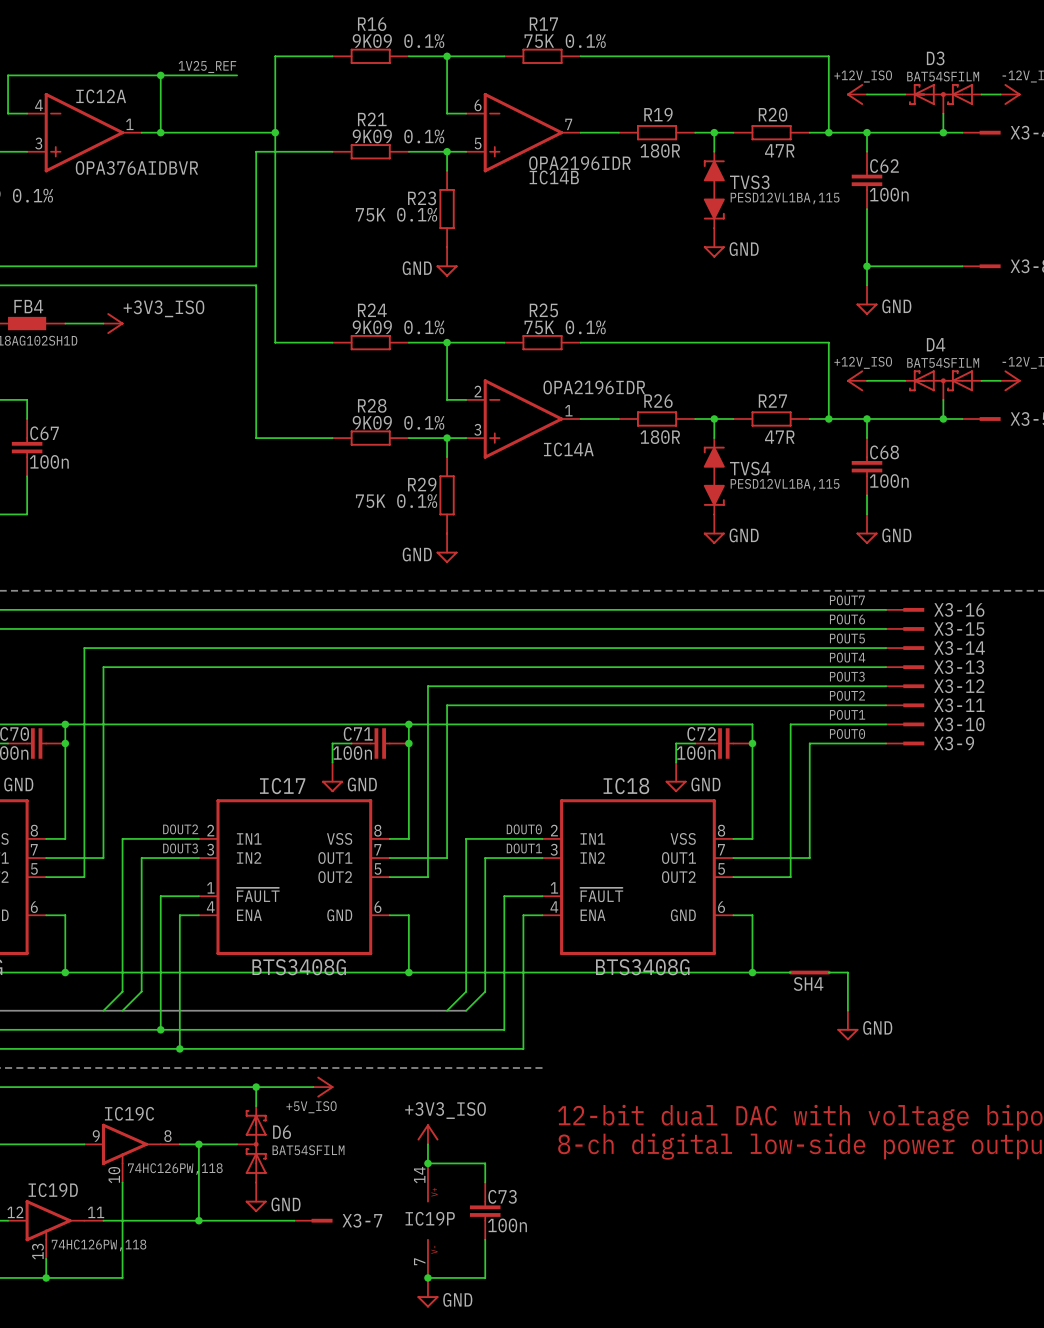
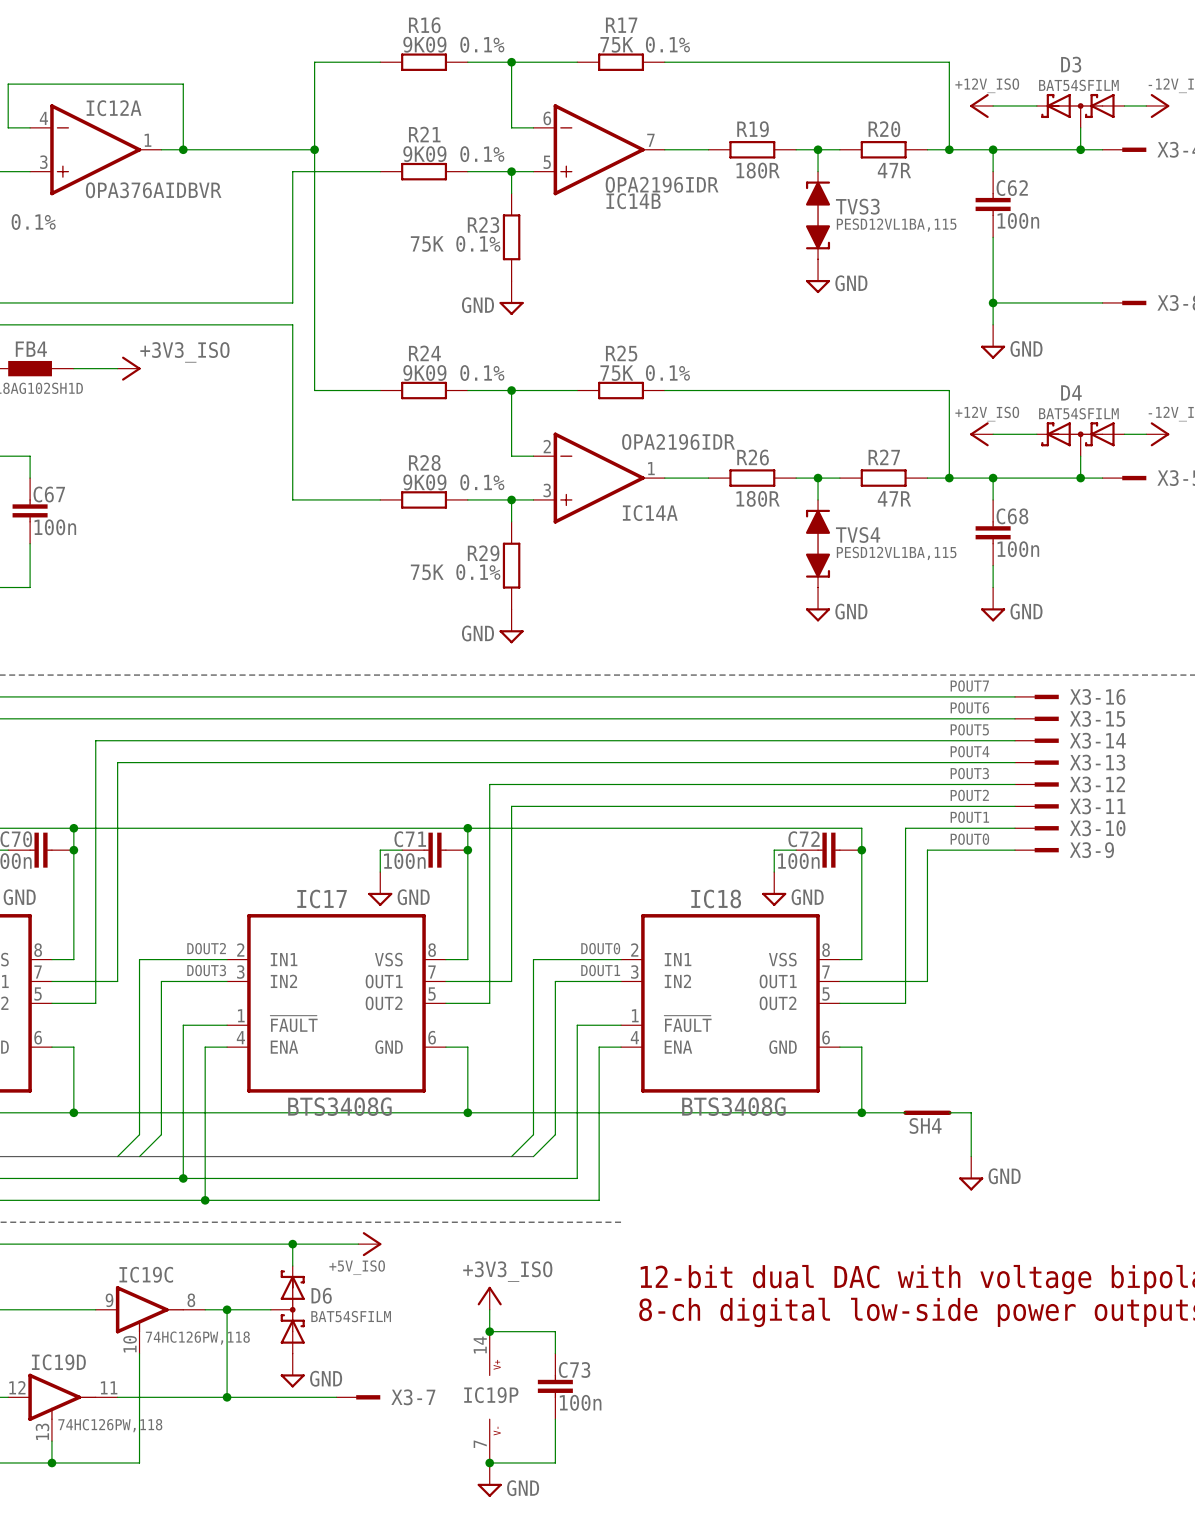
label: 1V25_REF (207, 66) -> none
wire: (160, 75) (237, 75) -> none
junction: (160, 75) -> none

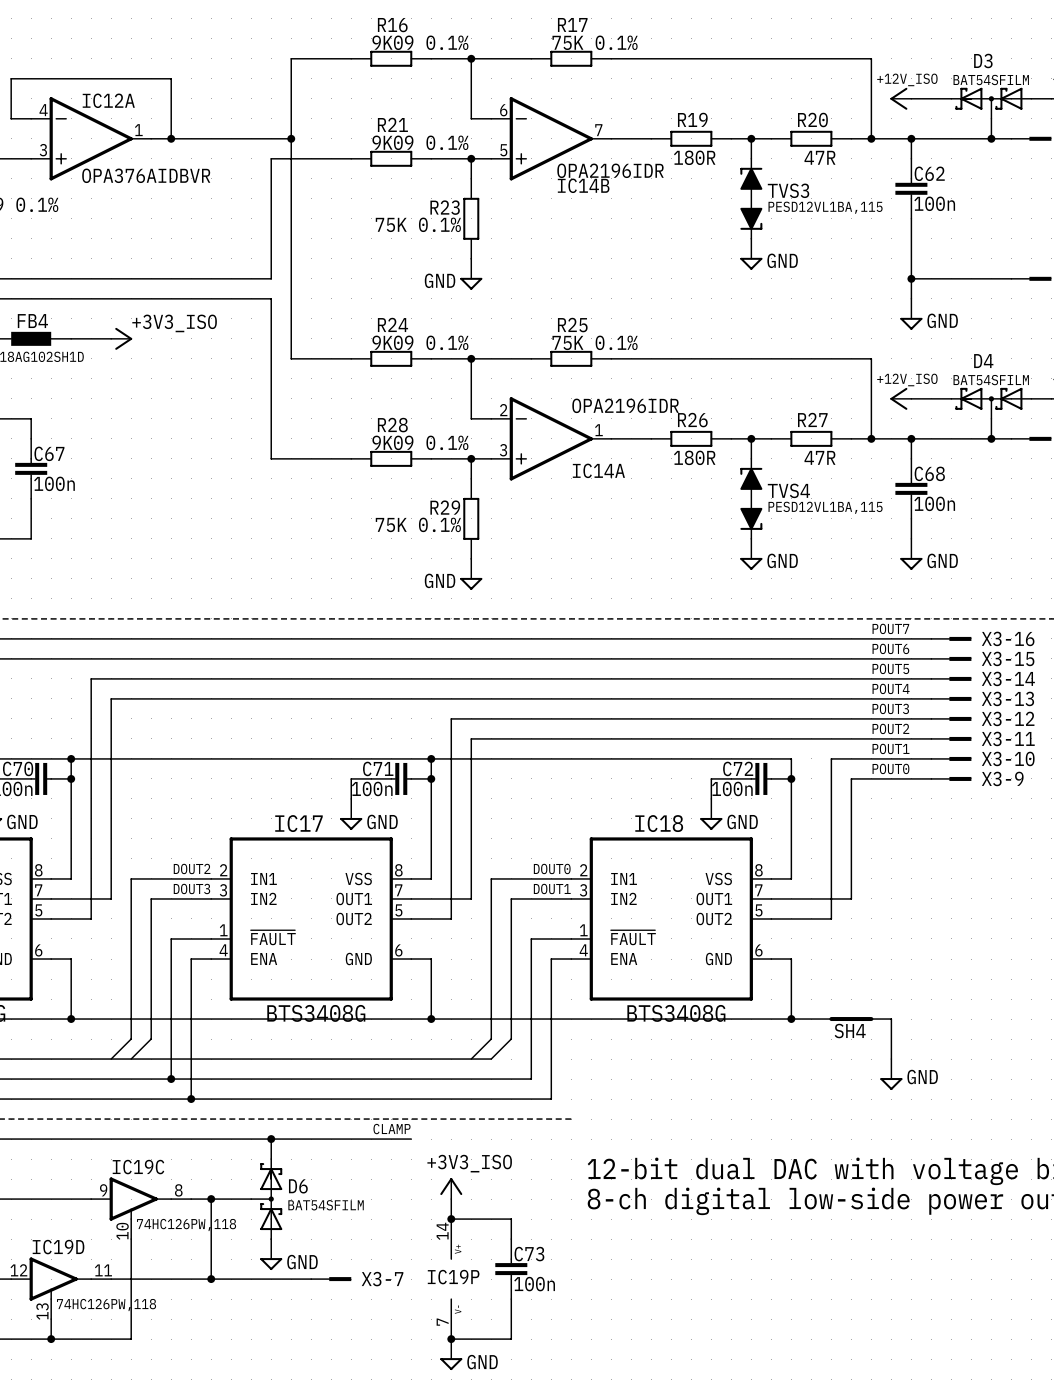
label: none -> CLAMP (392, 1129)
wire: none -> (331, 1139) (411, 1139)
power symbol: +5V_ISO (369, 1244) -> none

